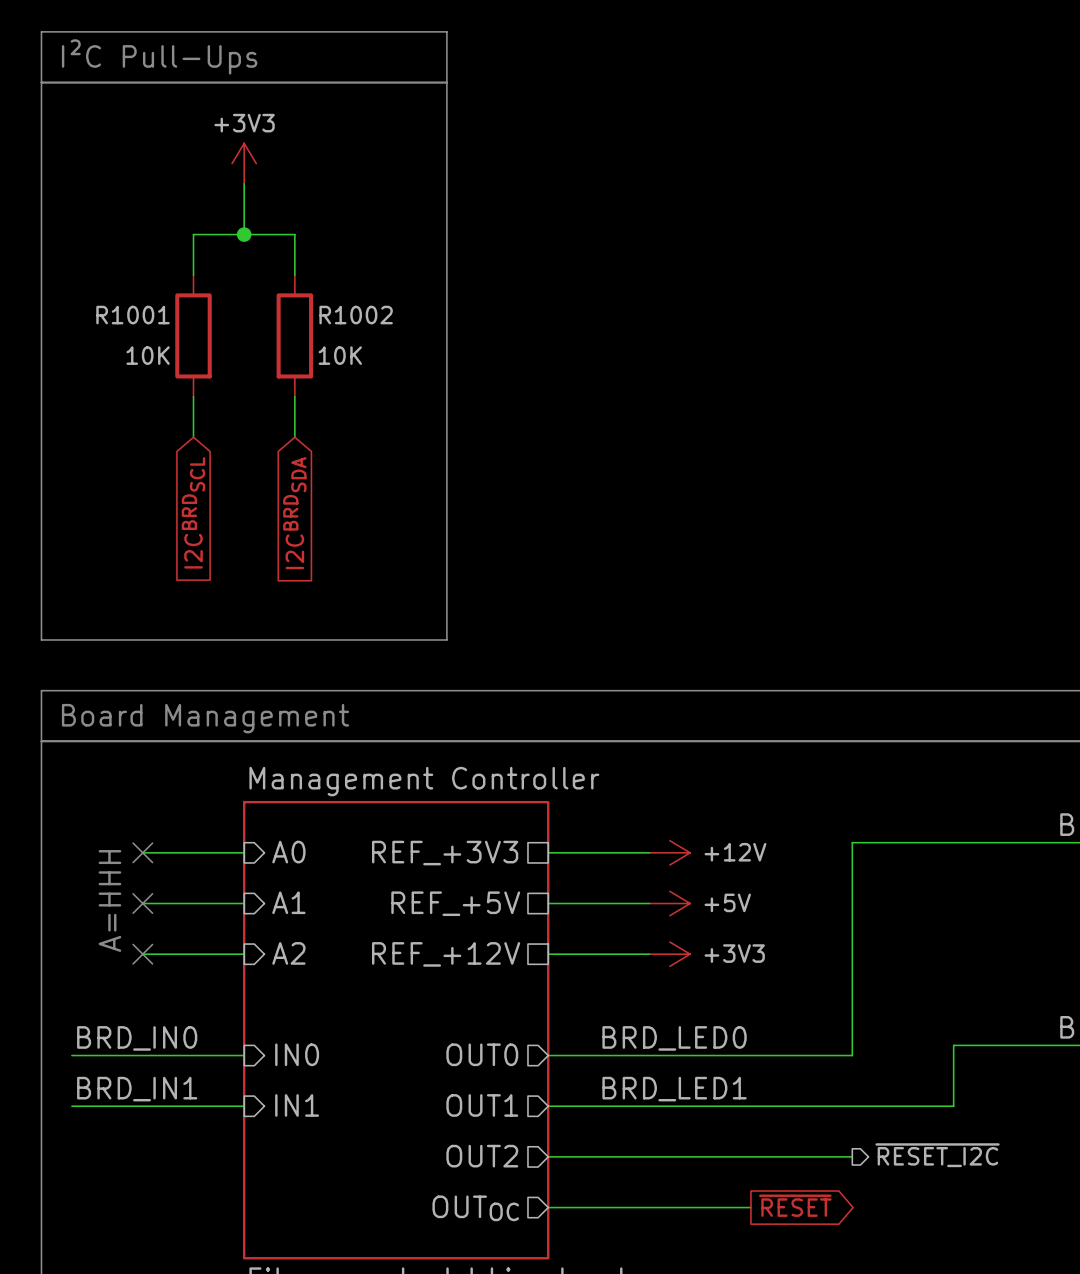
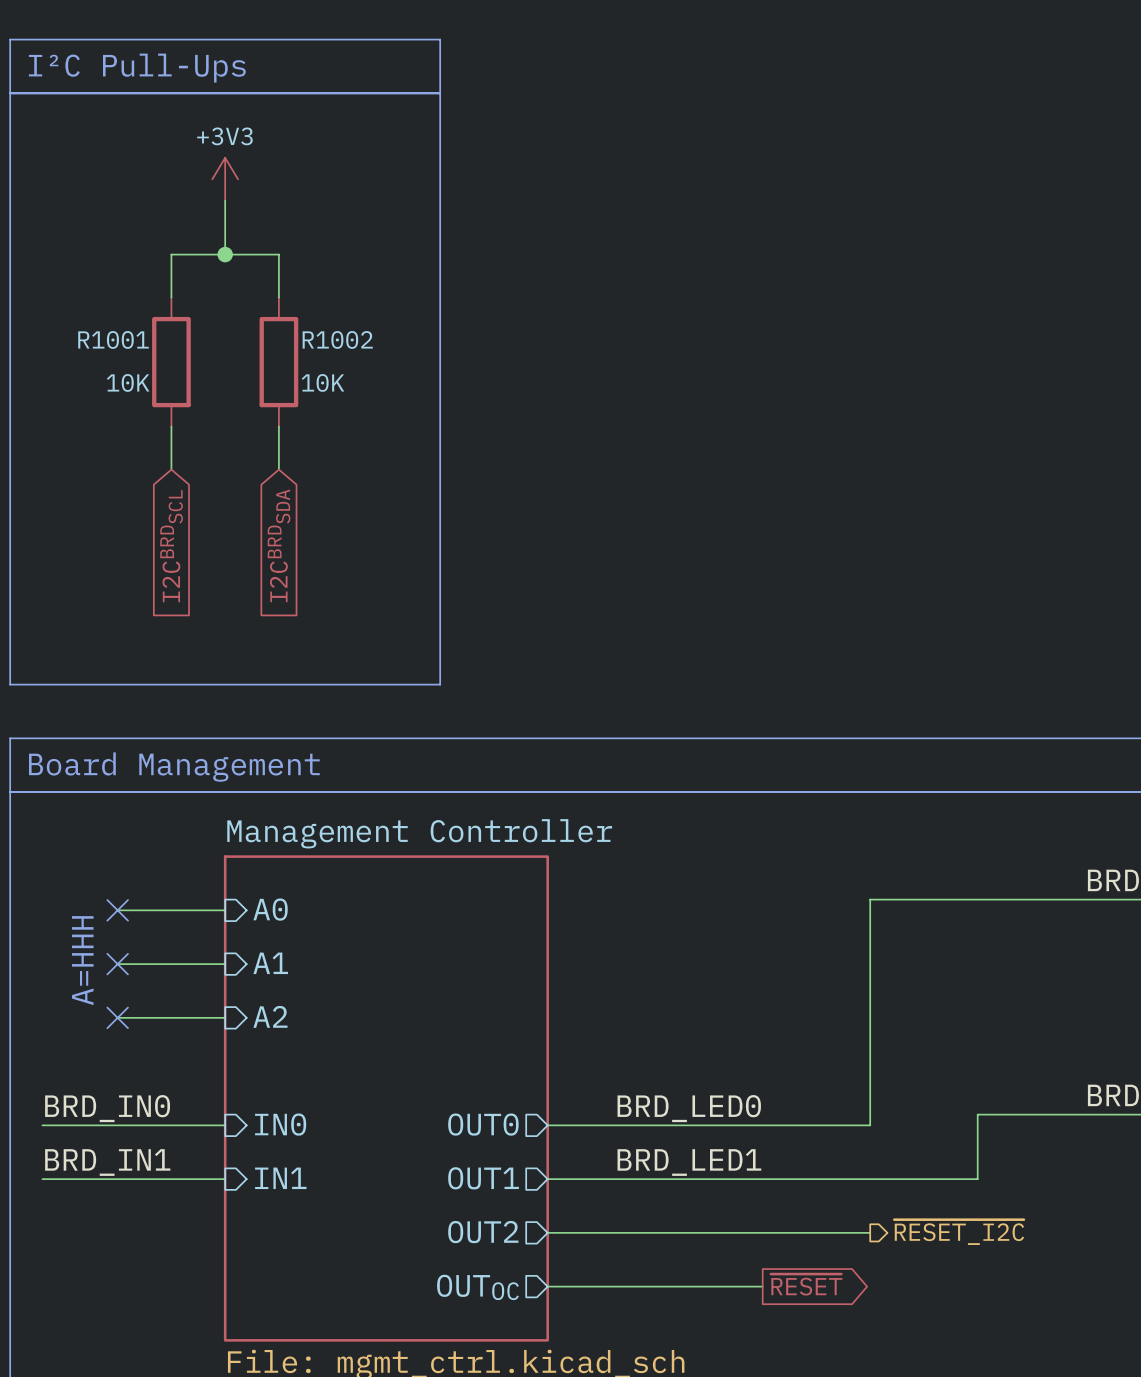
wire: (548, 852) (649, 852) -> none
power symbol: +12V (669, 852) -> none
sheet pin: REF_+3V3 (445, 853) -> none
sheet pin: REF_+5V (455, 903) -> none
wire: (548, 903) (649, 903) -> none
power symbol: +5V (669, 903) -> none
sheet pin: REF_+12V (446, 954) -> none
wire: (548, 954) (649, 954) -> none
power symbol: +3V3 (669, 954) -> none

